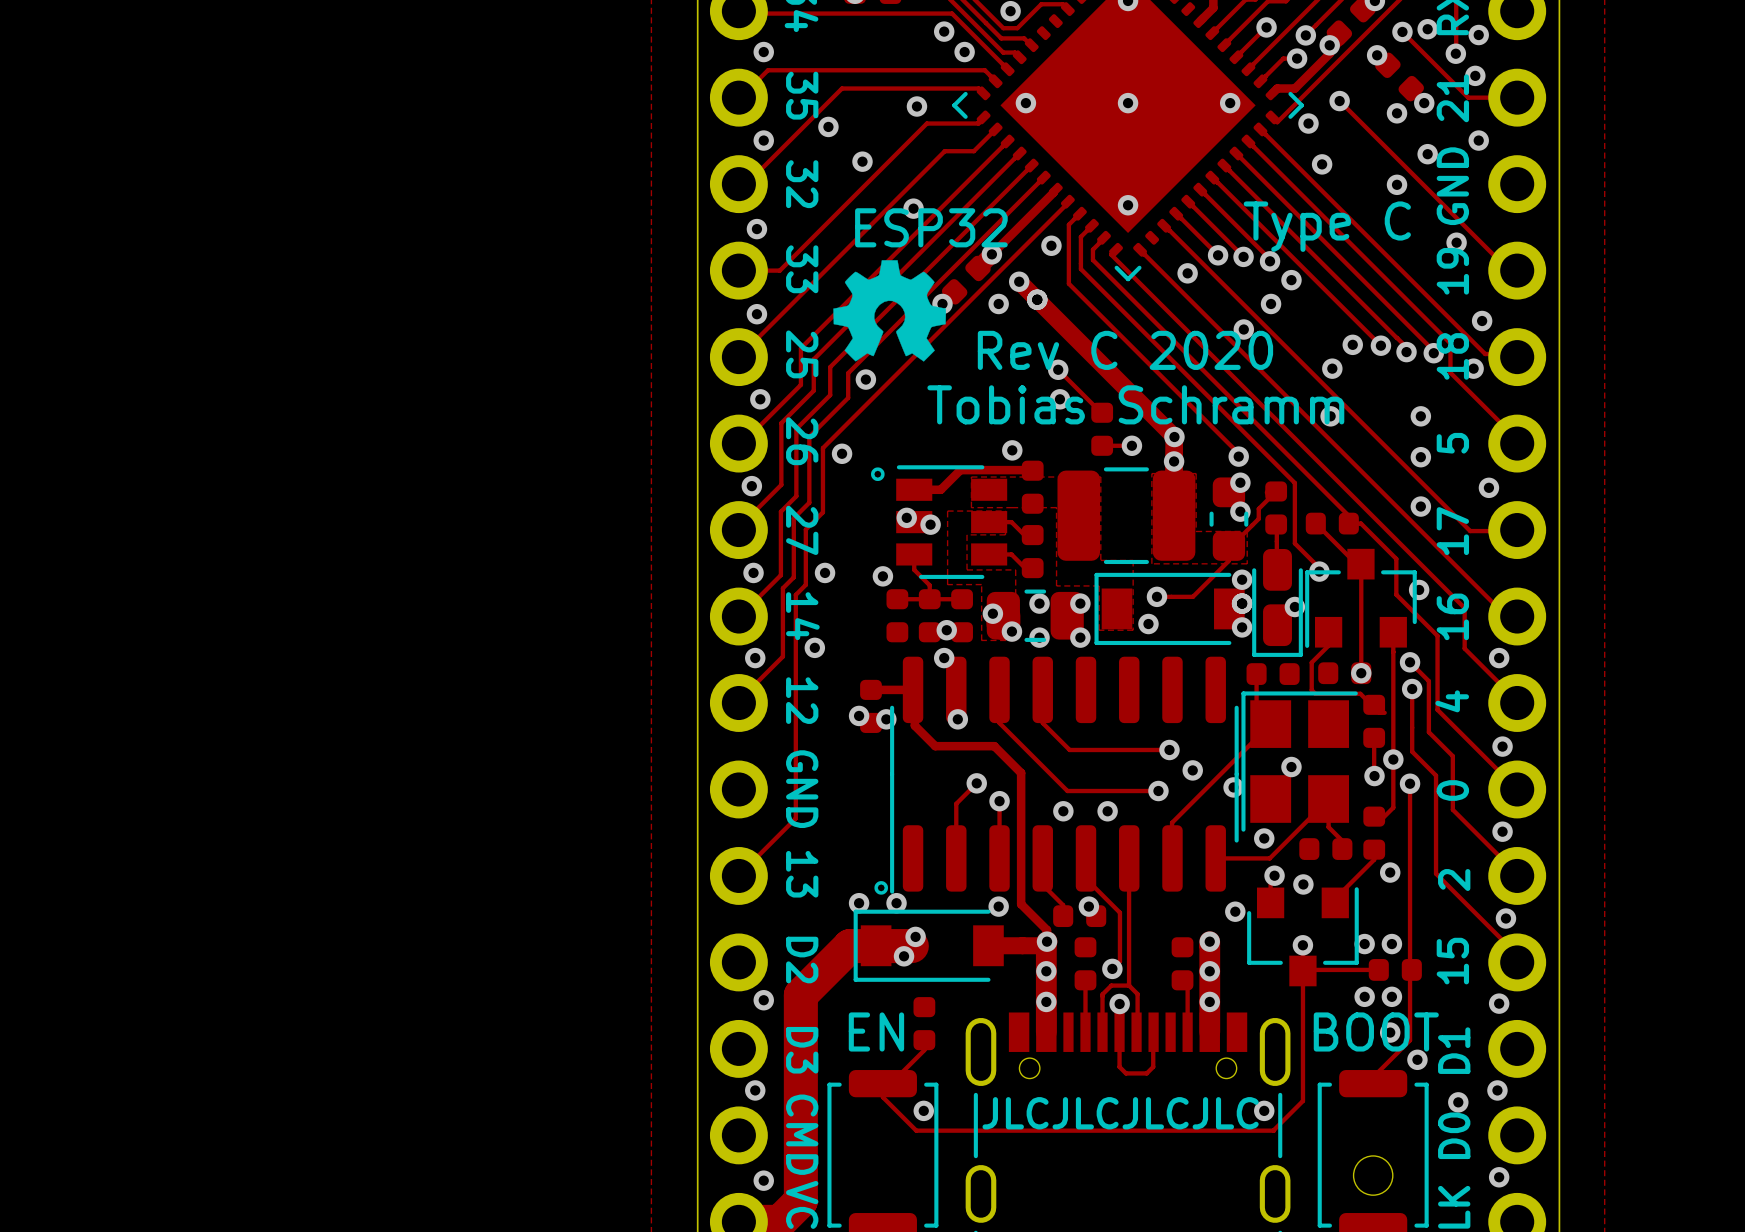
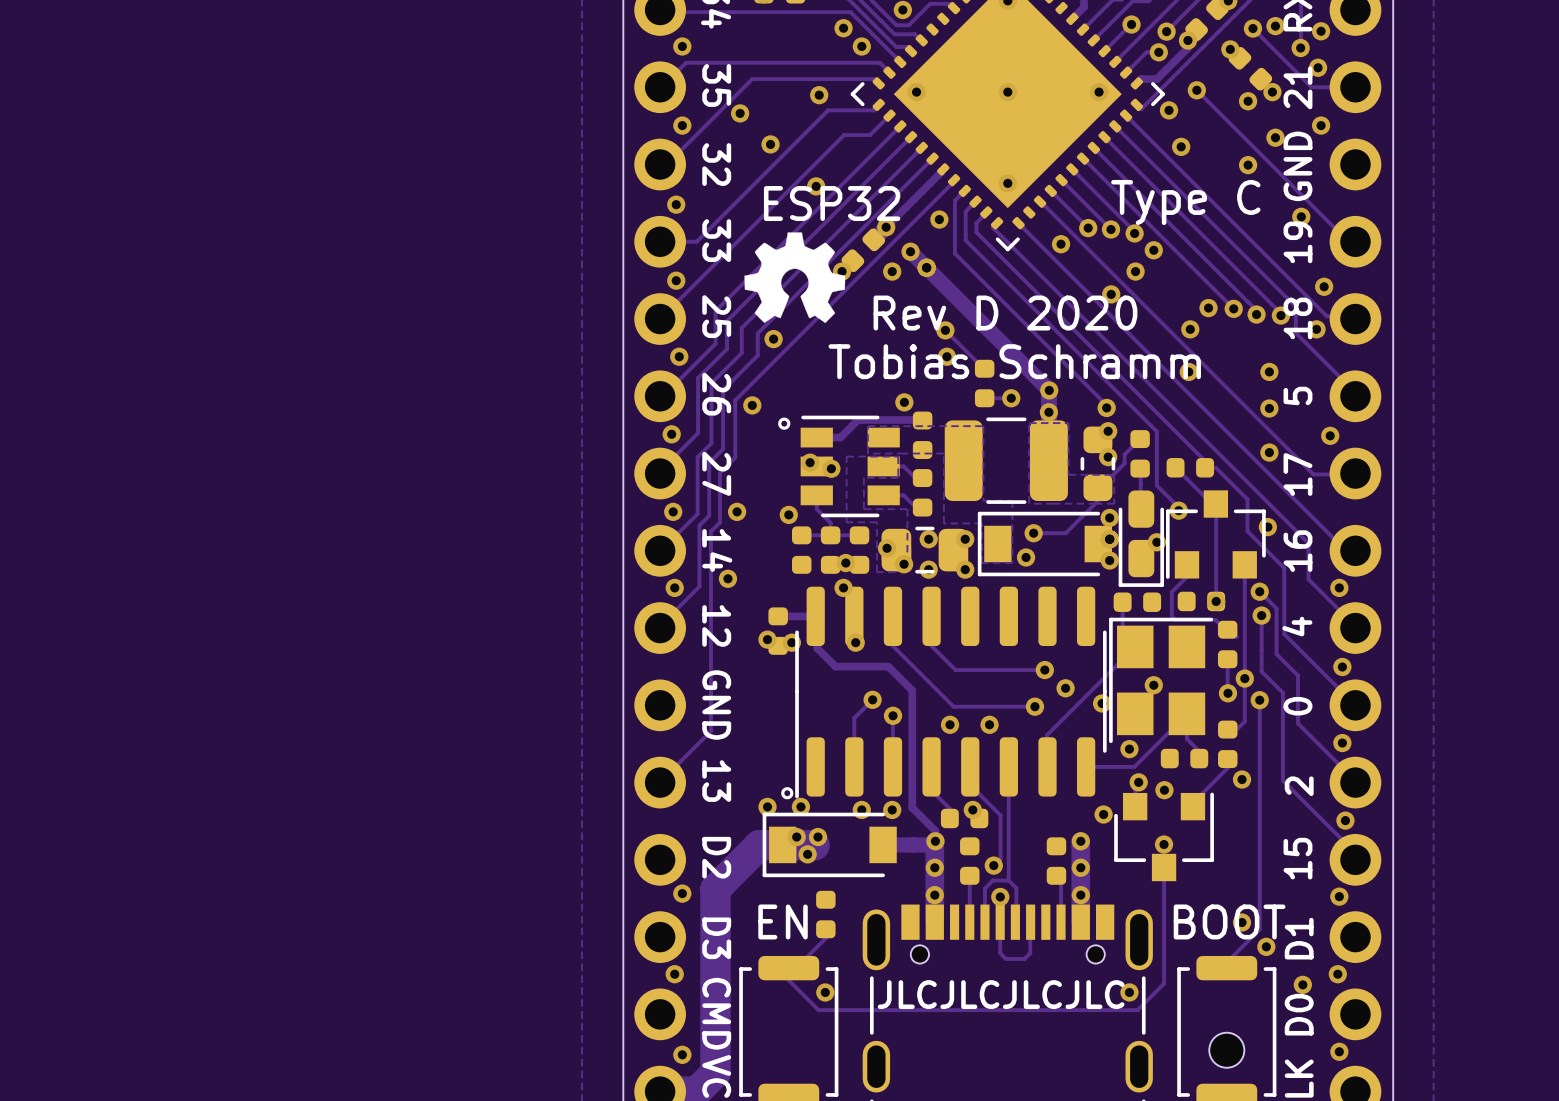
text: Rev C 2020 (1125, 350) -> Rev D 2020 (1005, 313)
via: none -> (861, 809)
via: none -> (796, 837)
via: (1364, 944) -> none
via: (1391, 944) -> none
track: (1303, 969) (1378, 969) -> none
part: (1395, 969) -> none
via: (1364, 996) -> none
via: (1391, 996) -> none

